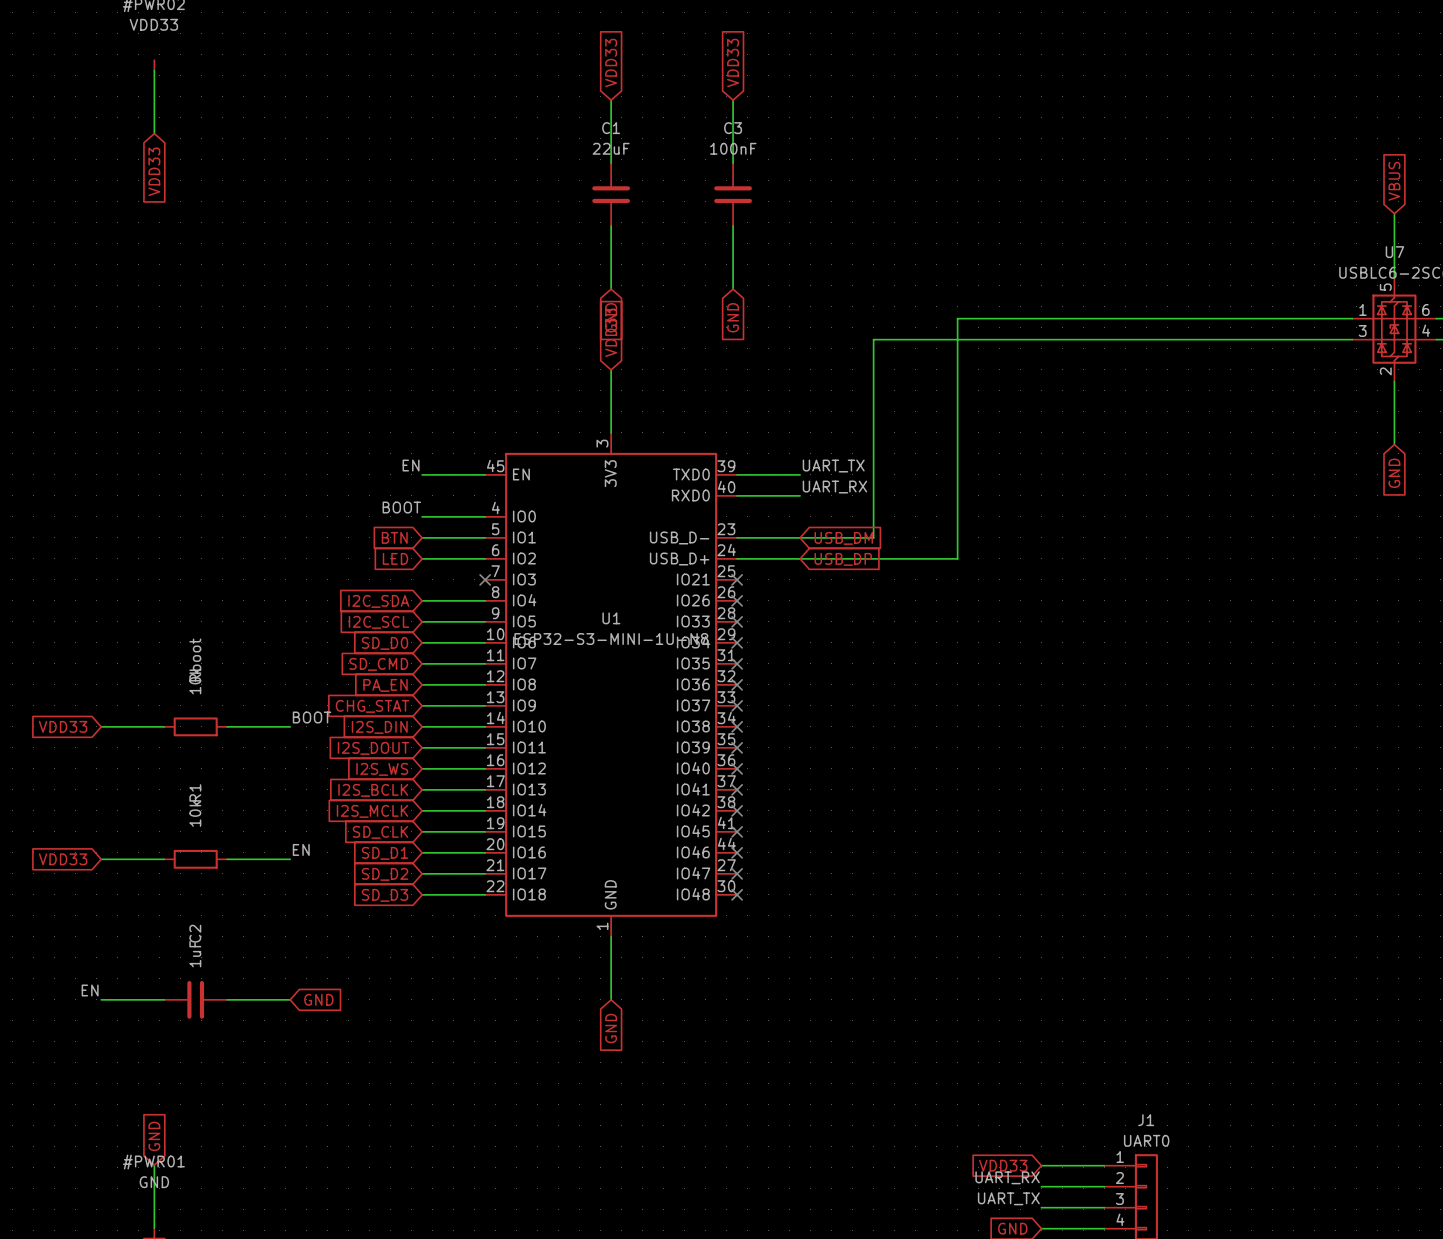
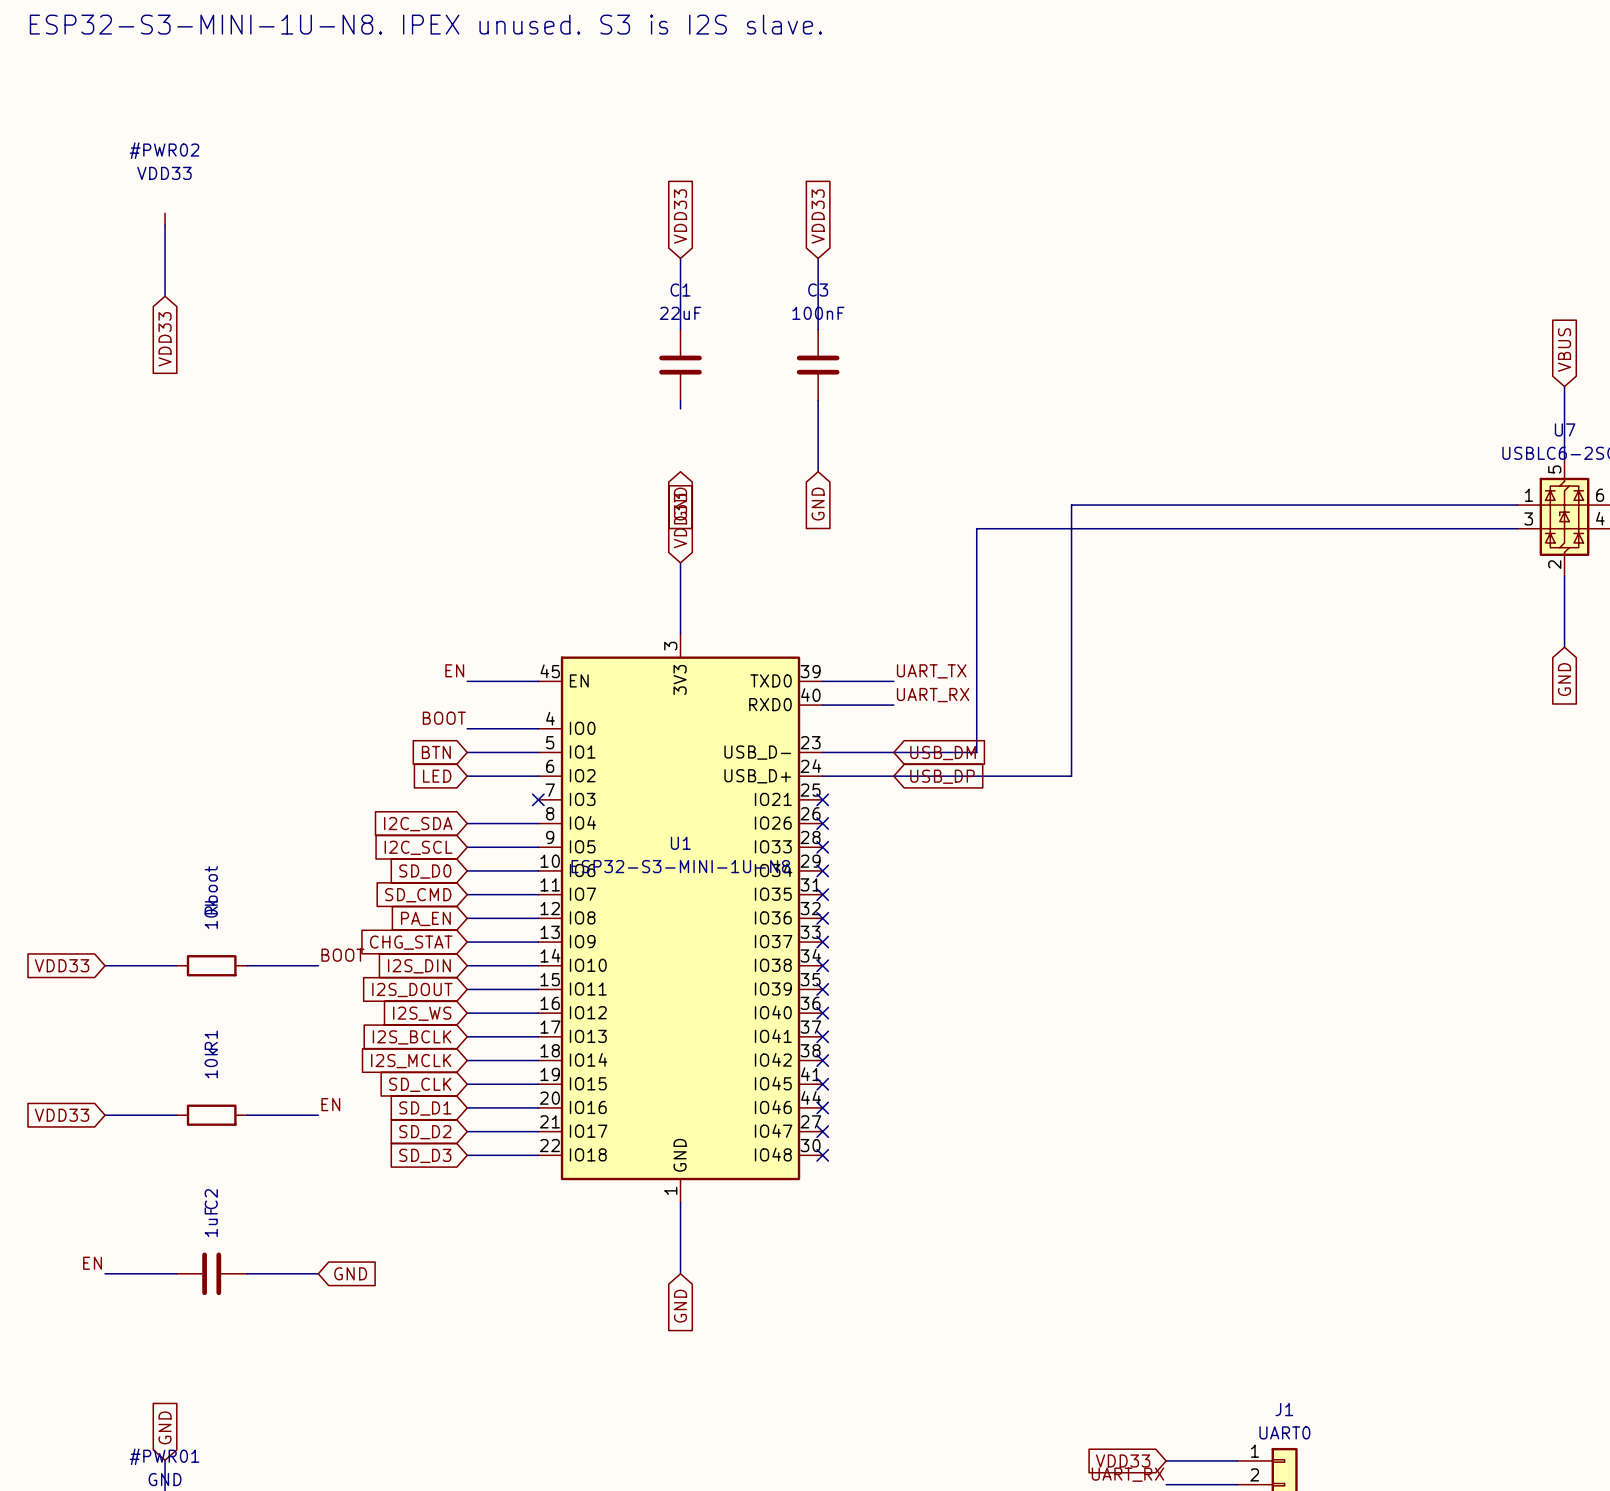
wire: (611, 233) (611, 289) -> none

